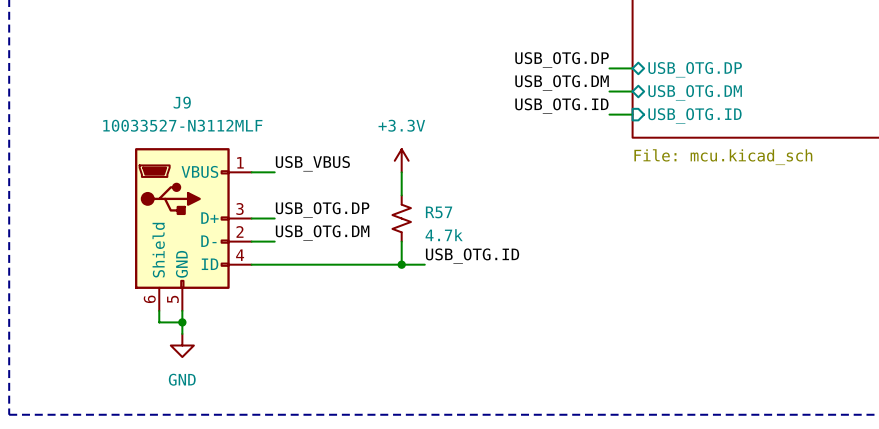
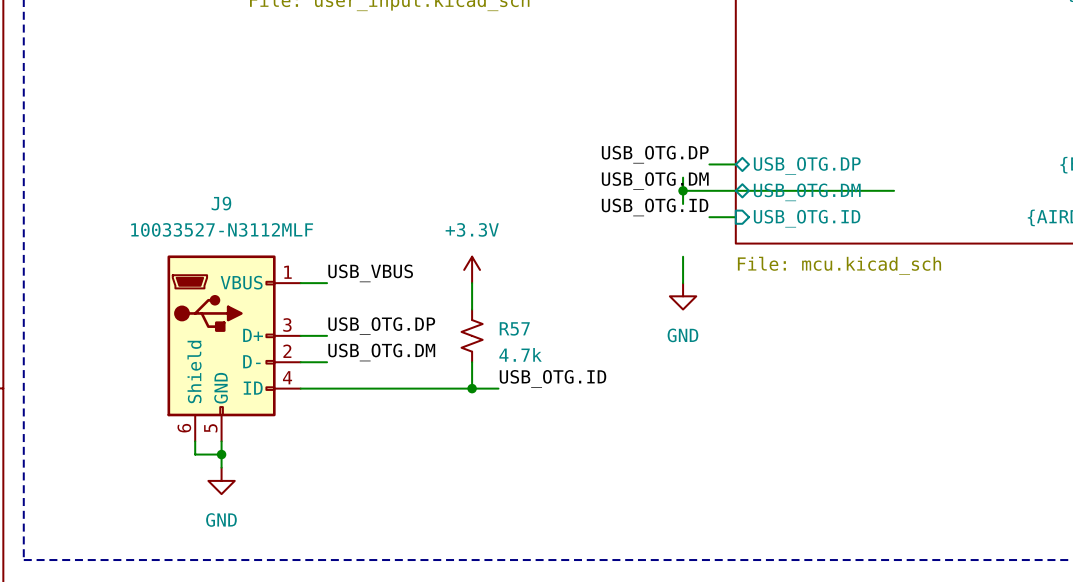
wire: none -> (683, 177) (683, 204)
wire: none -> (683, 190) (709, 190)
junction: none -> (683, 190)
wire: none -> (735, 190) (894, 190)
wire: none -> (683, 256) (683, 283)
power symbol: none -> GND (683, 296)

